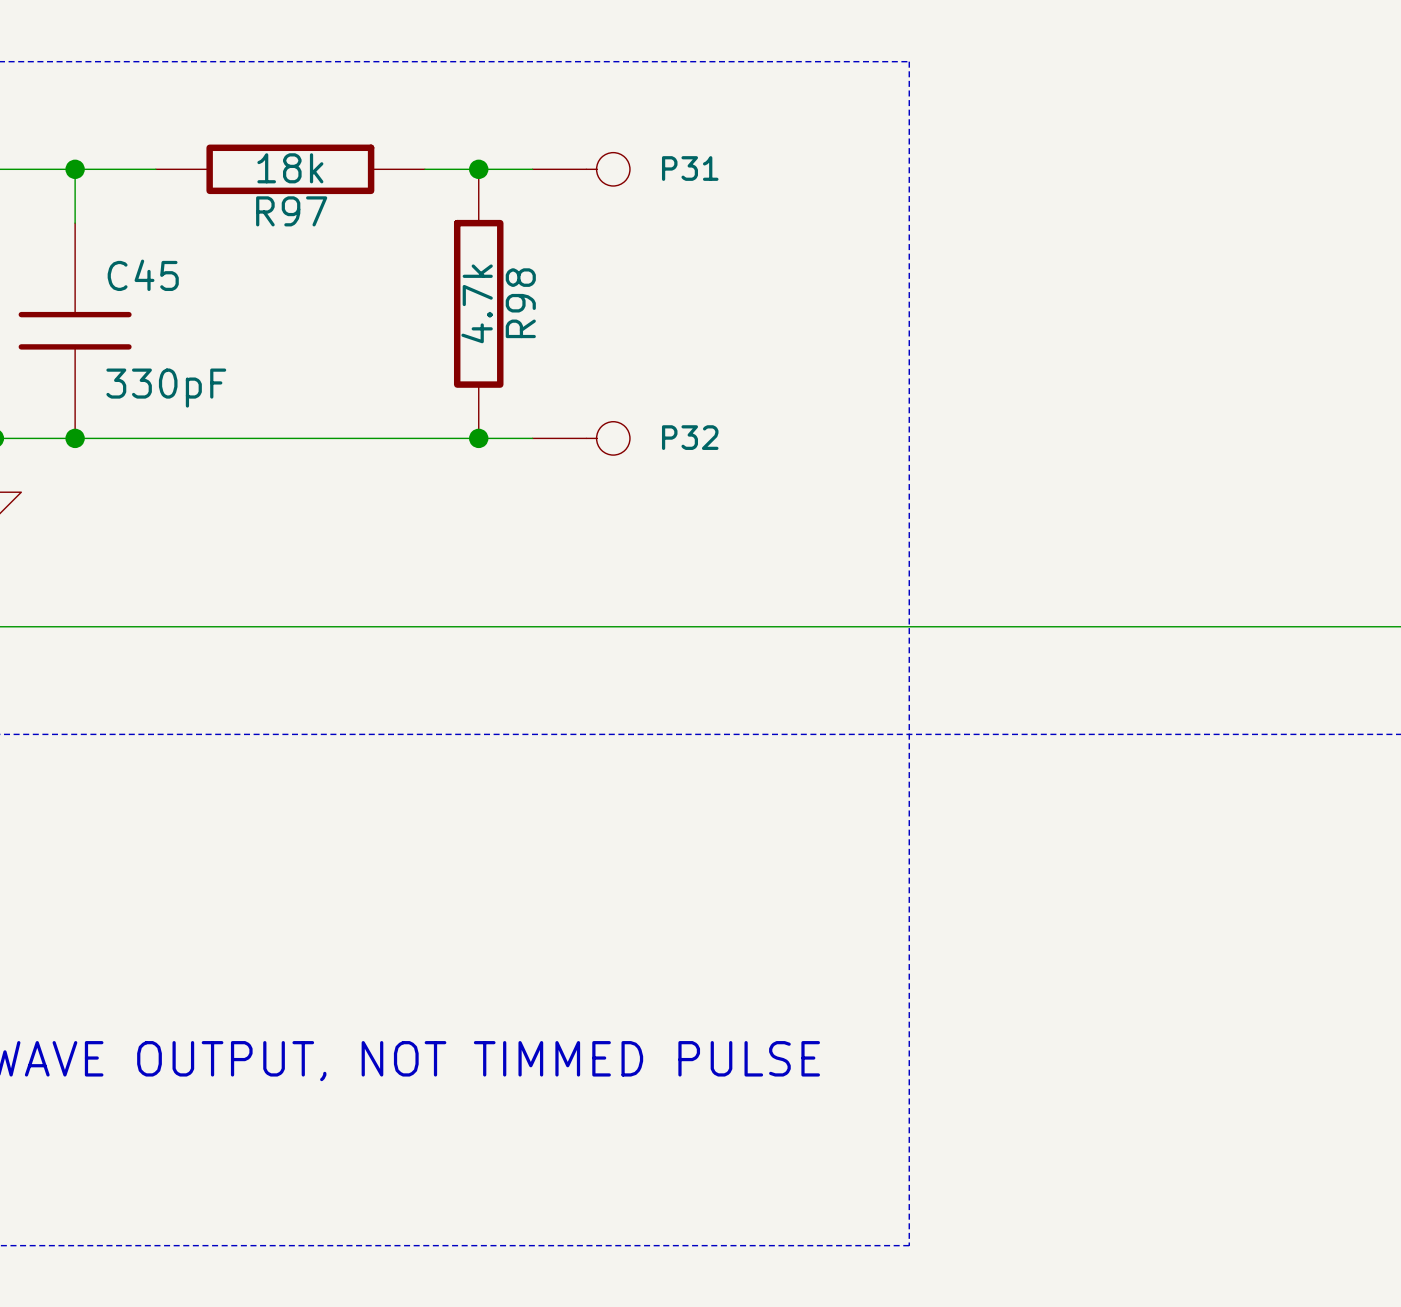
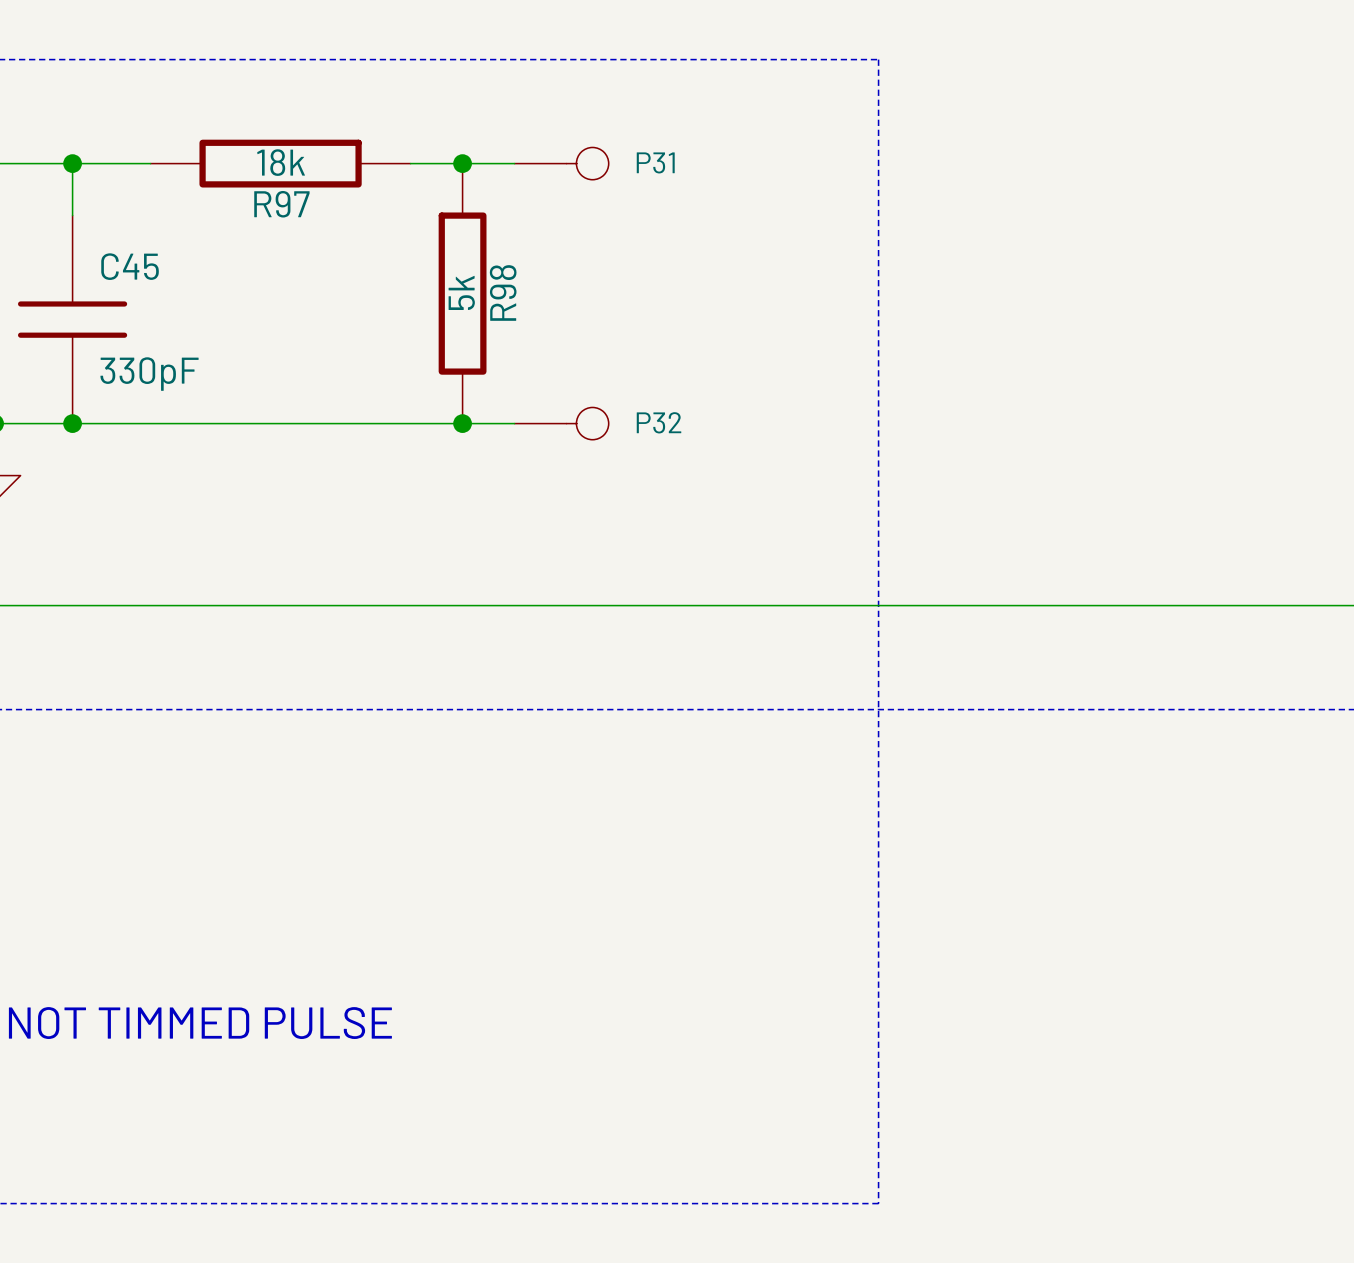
R98 value: 4.7k (477, 303) -> 5k (461, 292)

